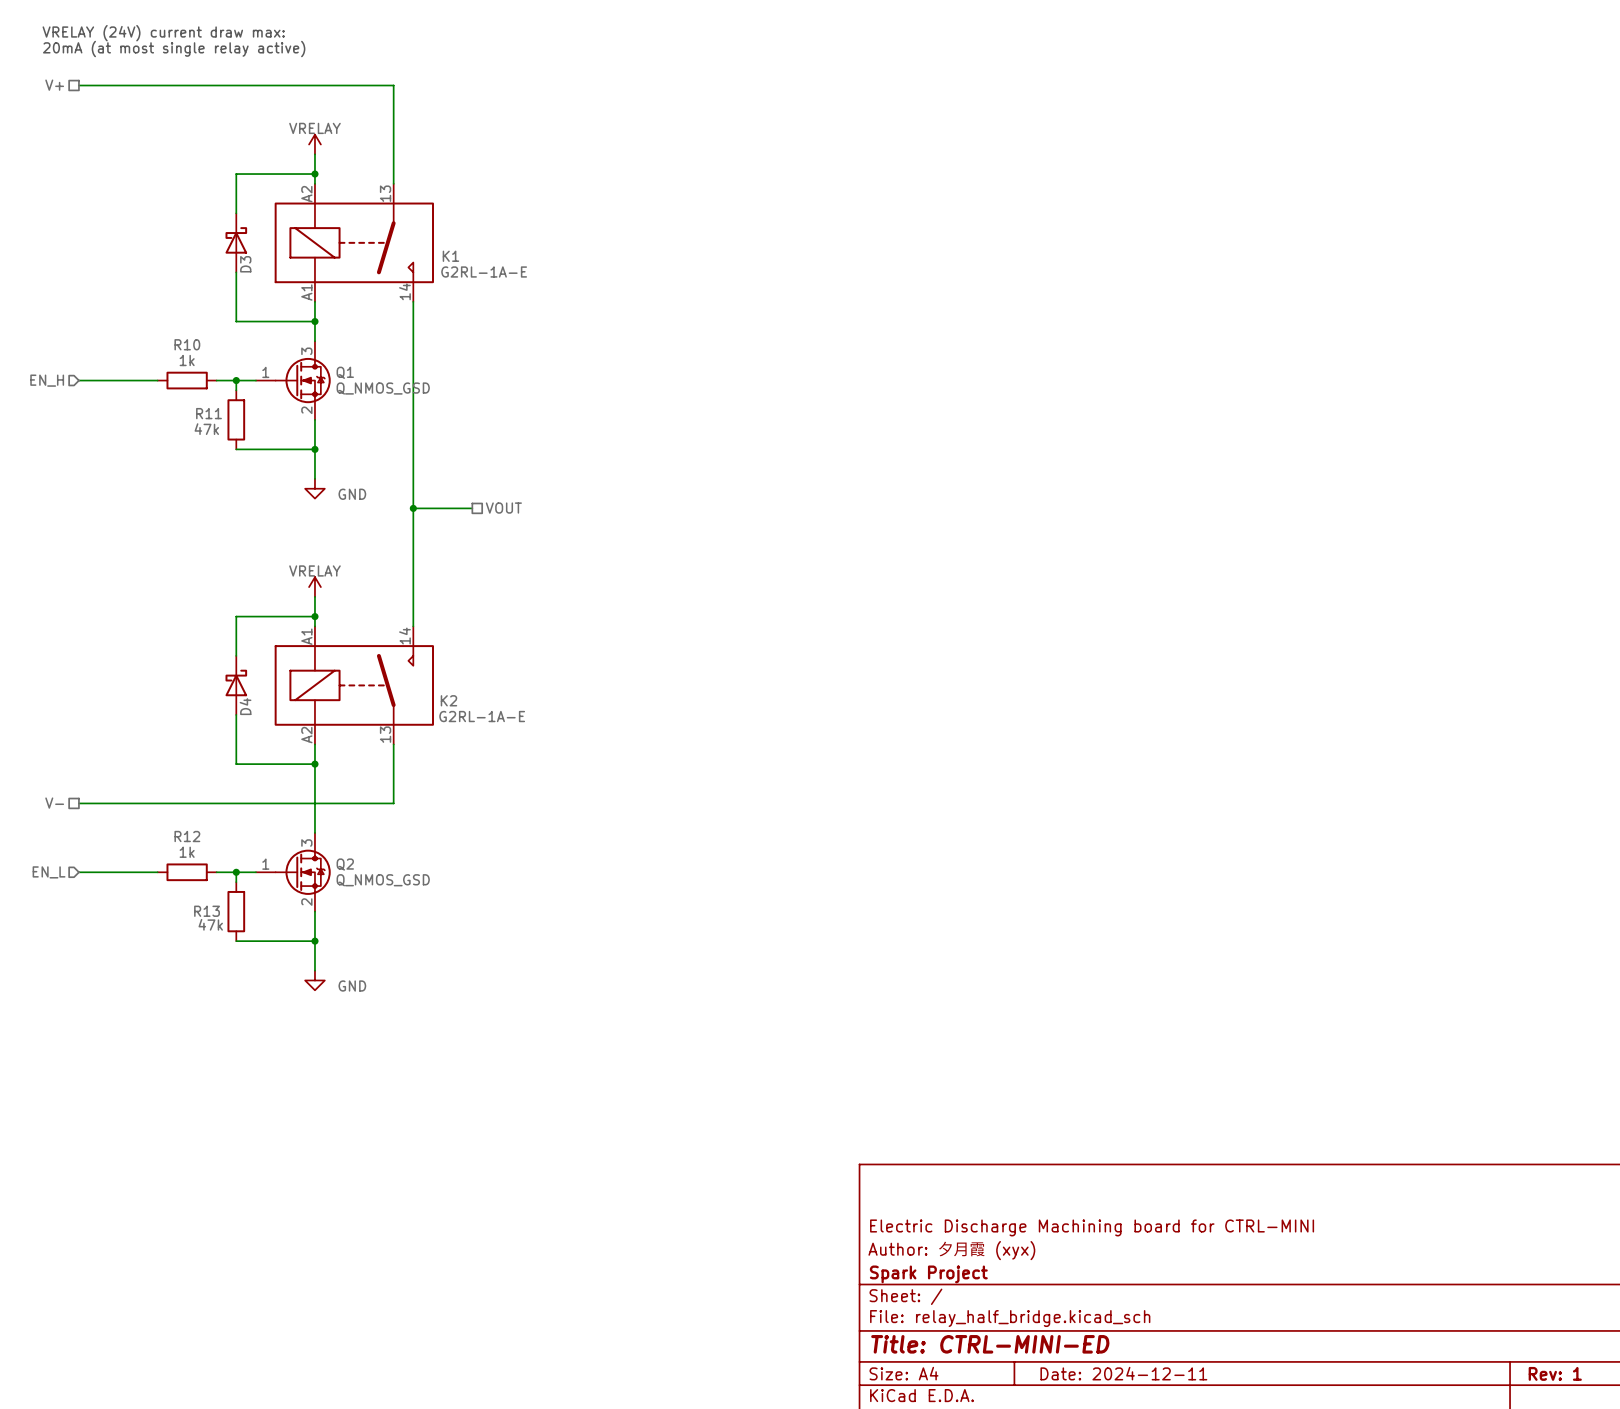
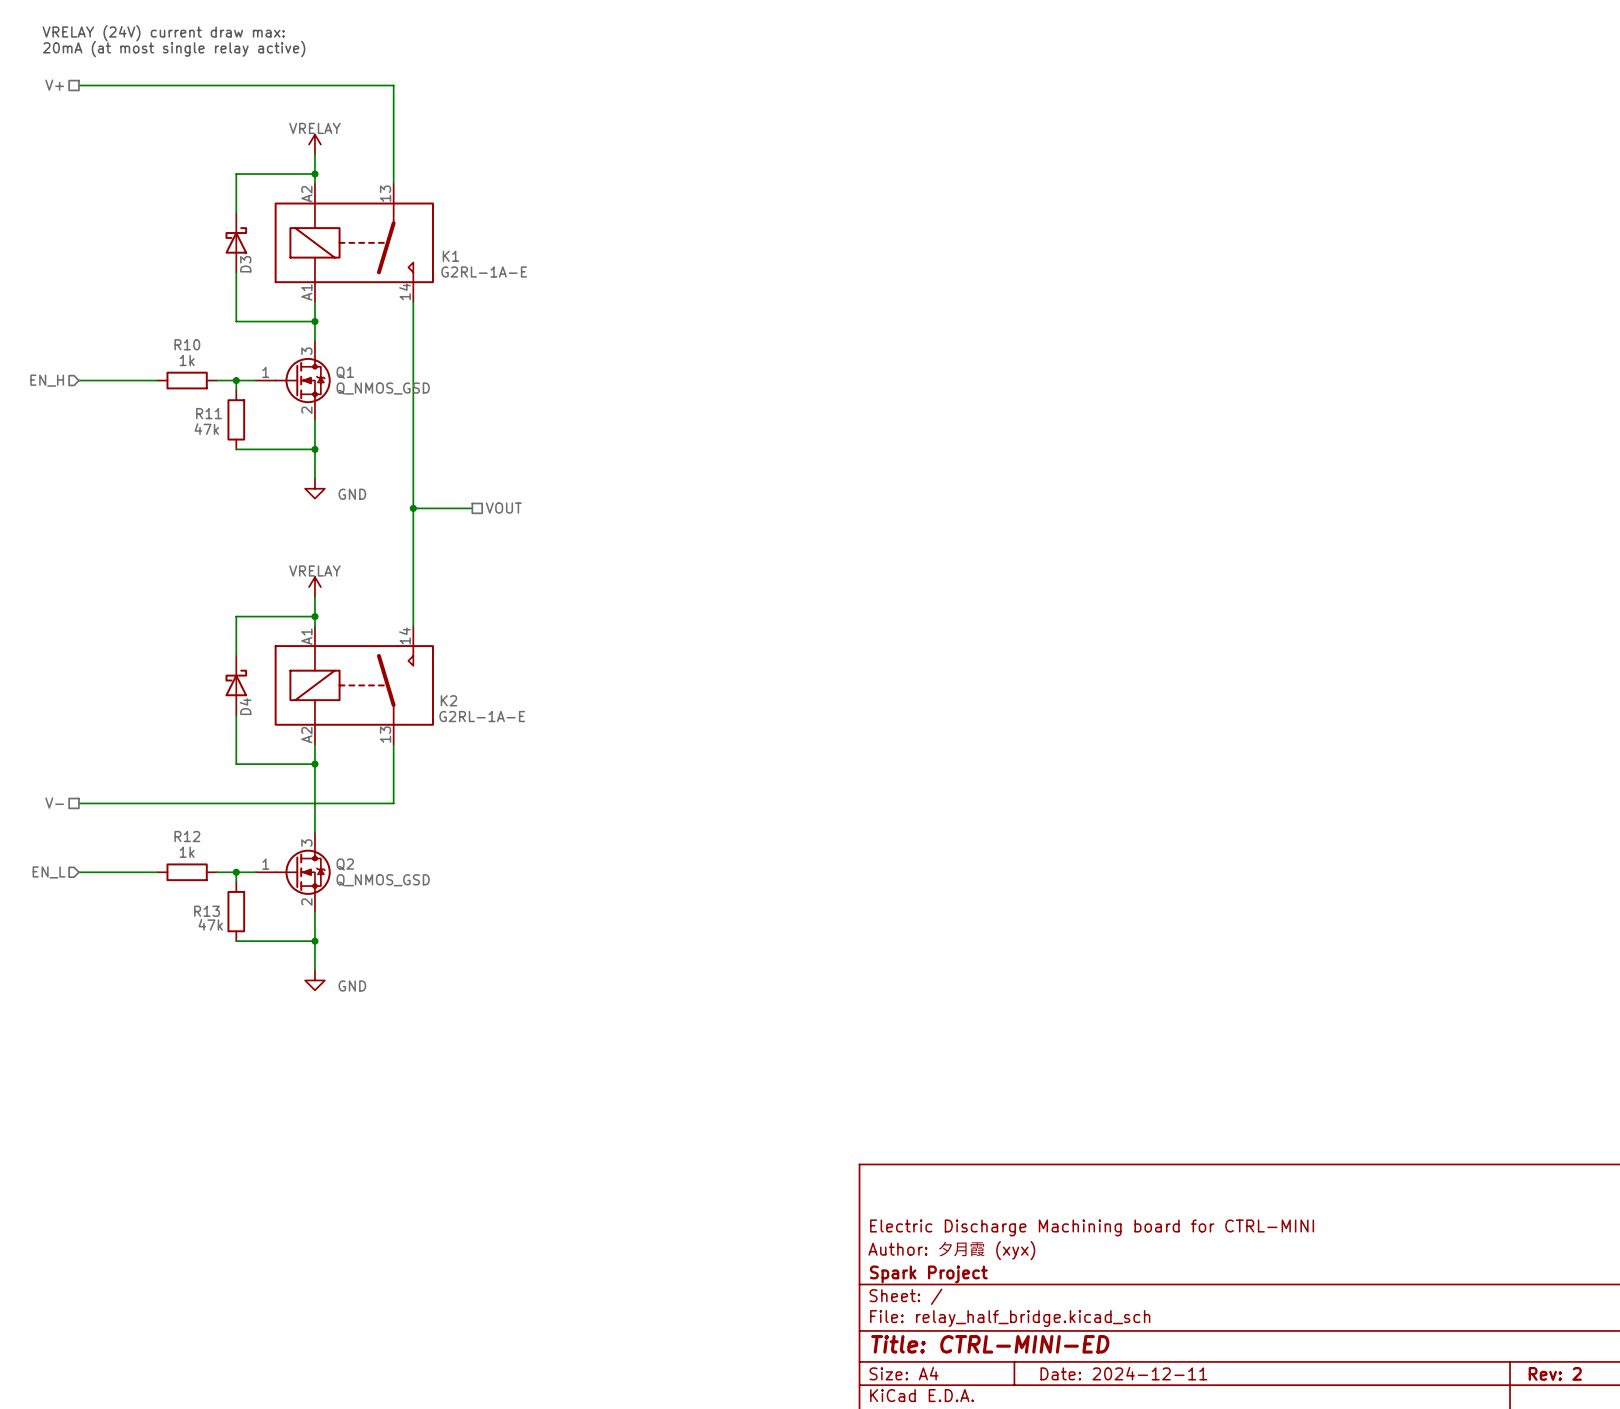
title block: Rev: 1 (1555, 1373) -> Rev: 2 (1555, 1373)

